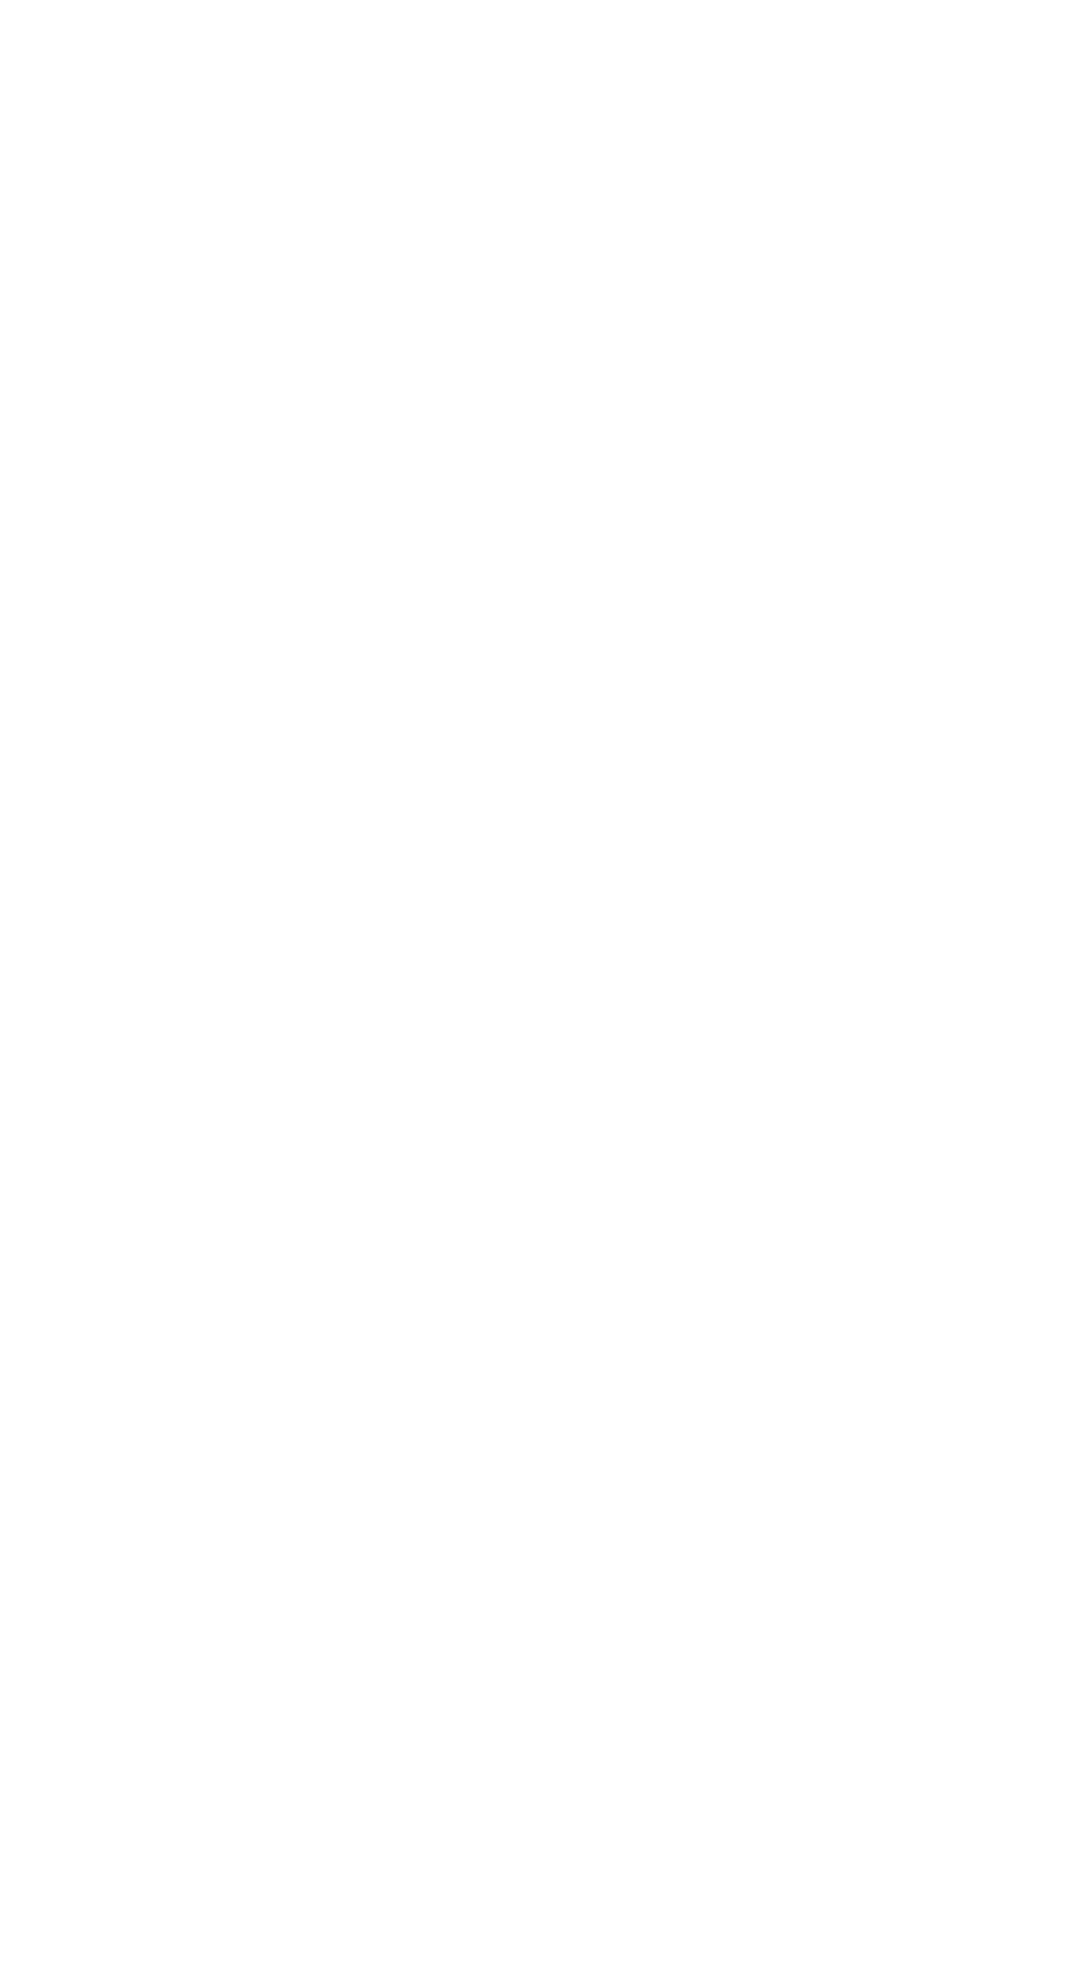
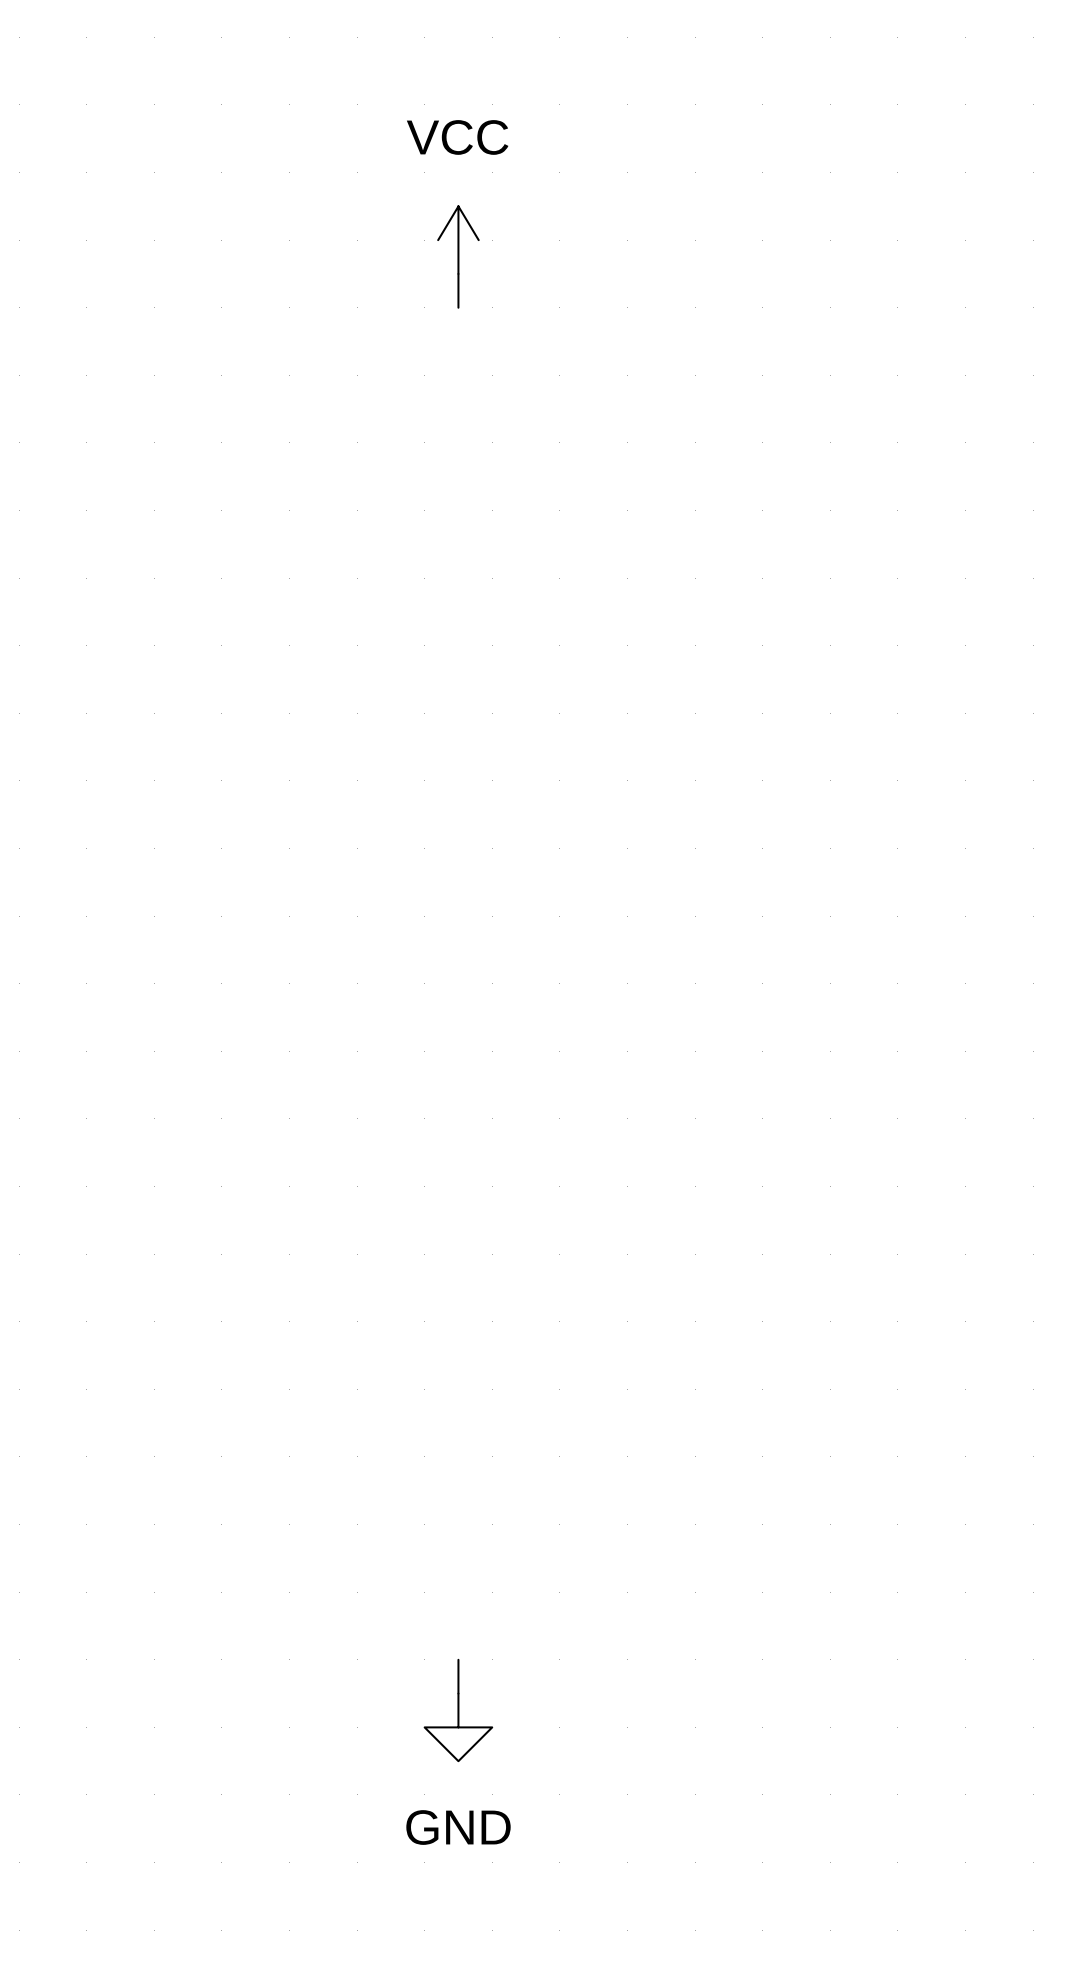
power symbol: none -> VCC (458, 240)
wire: none -> (458, 273) (458, 307)
wire: none -> (458, 1659) (458, 1693)
power symbol: none -> GND (458, 1727)

